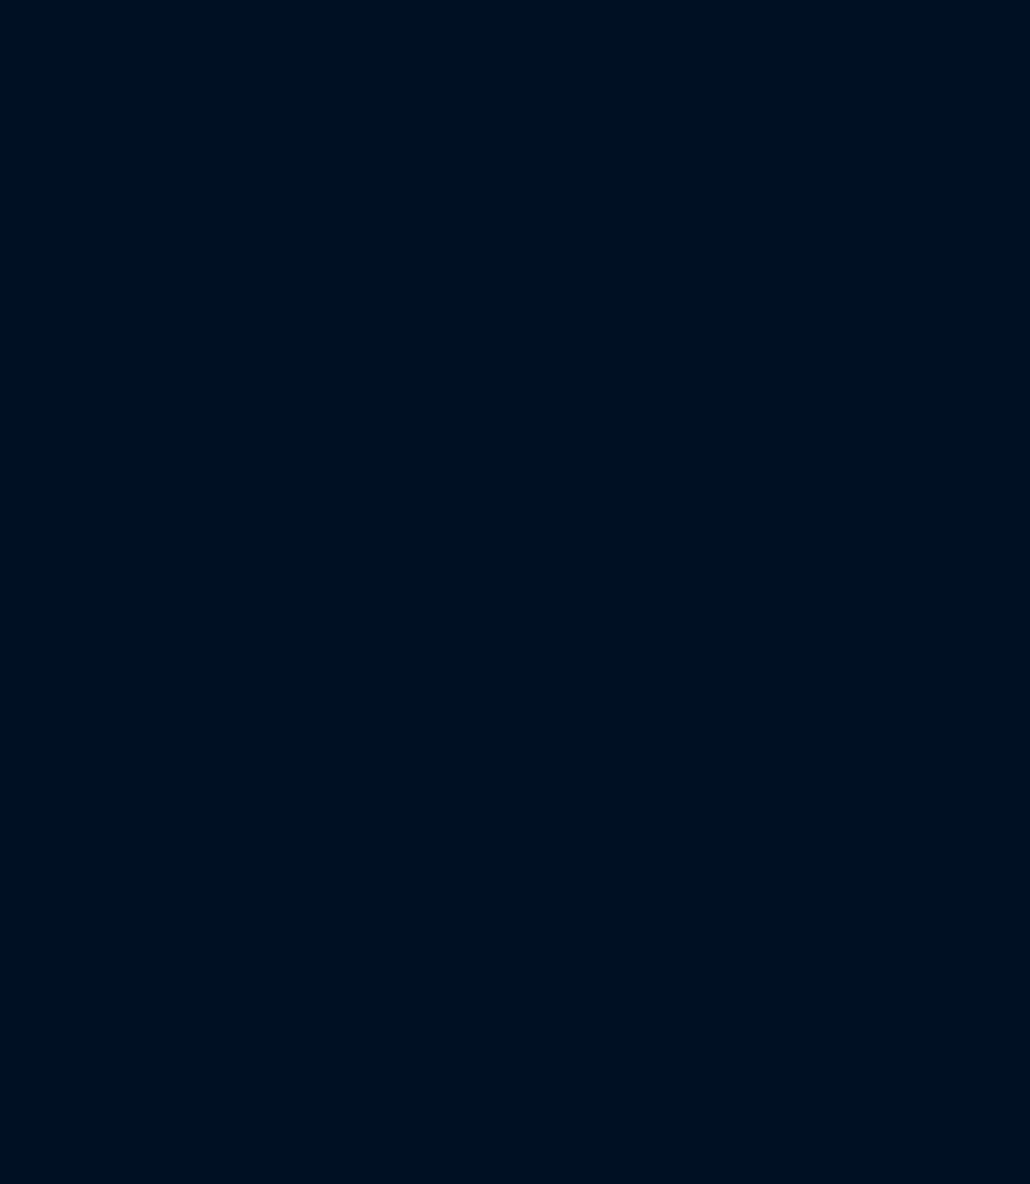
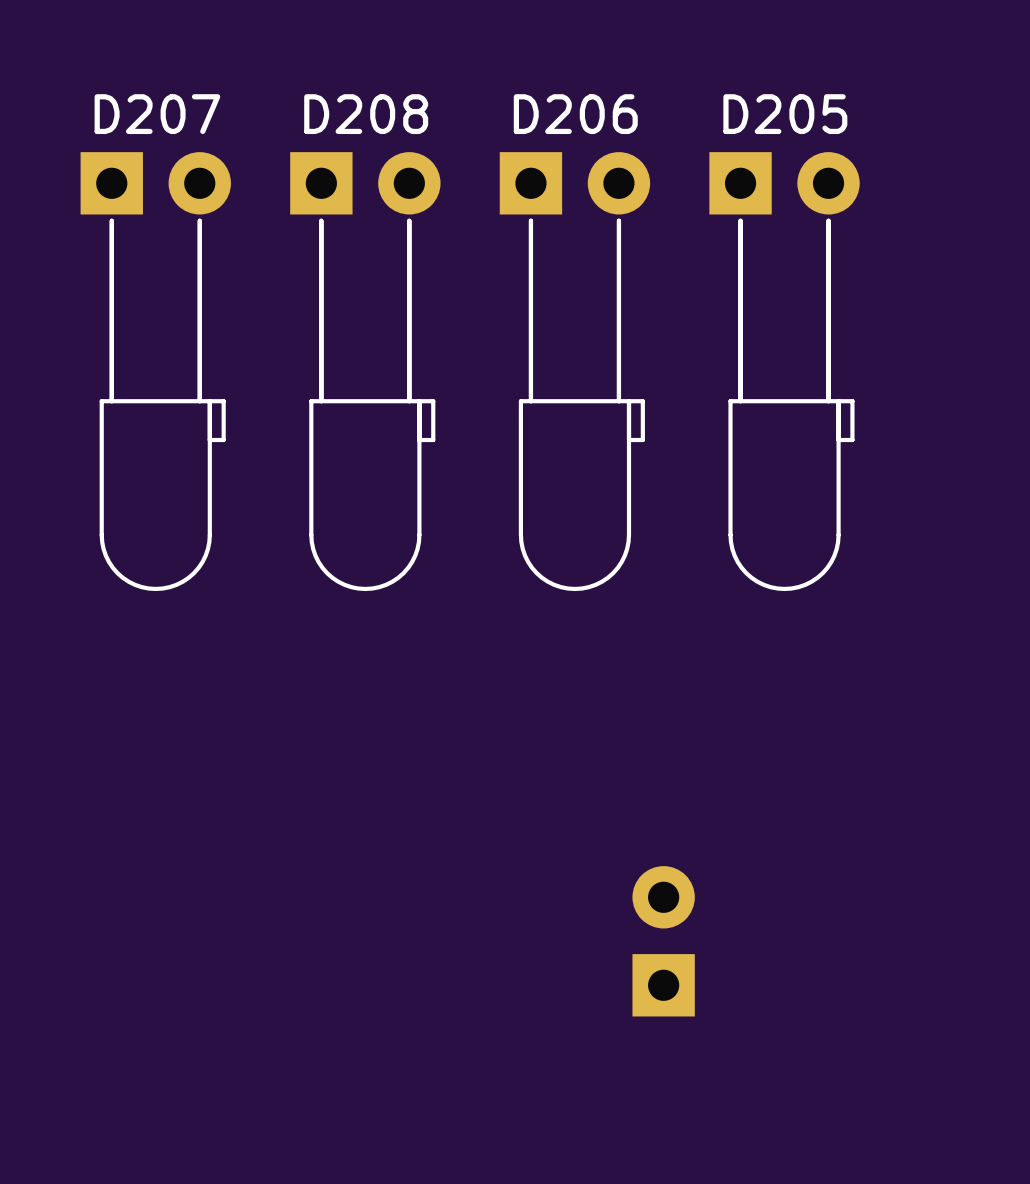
D207: none -> (155, 371)
D208: none -> (365, 371)
D206: none -> (574, 371)
D205: none -> (784, 371)
part: none -> (663, 941)

